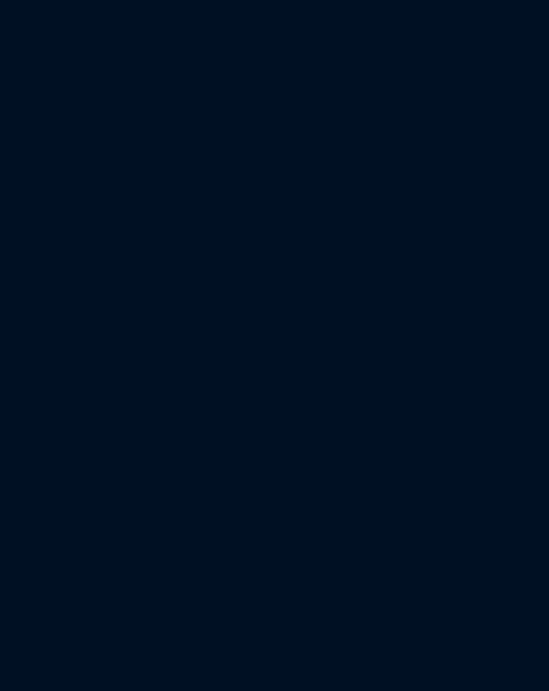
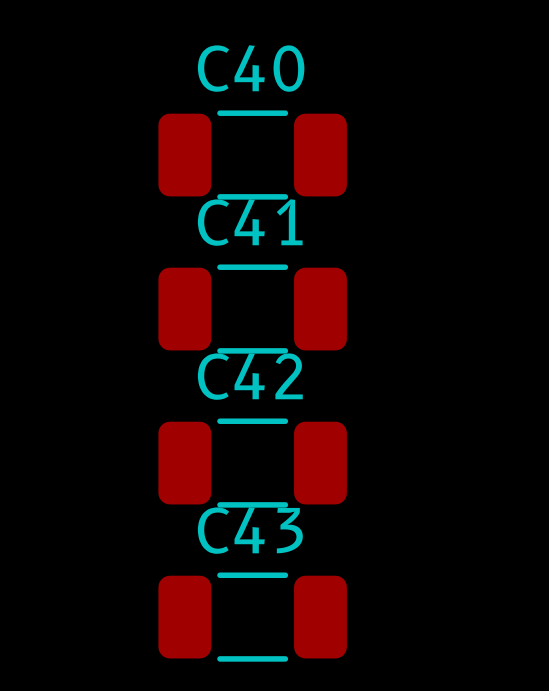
C40: none -> (252, 155)
C41: none -> (252, 309)
C42: none -> (252, 463)
C43: none -> (252, 617)

